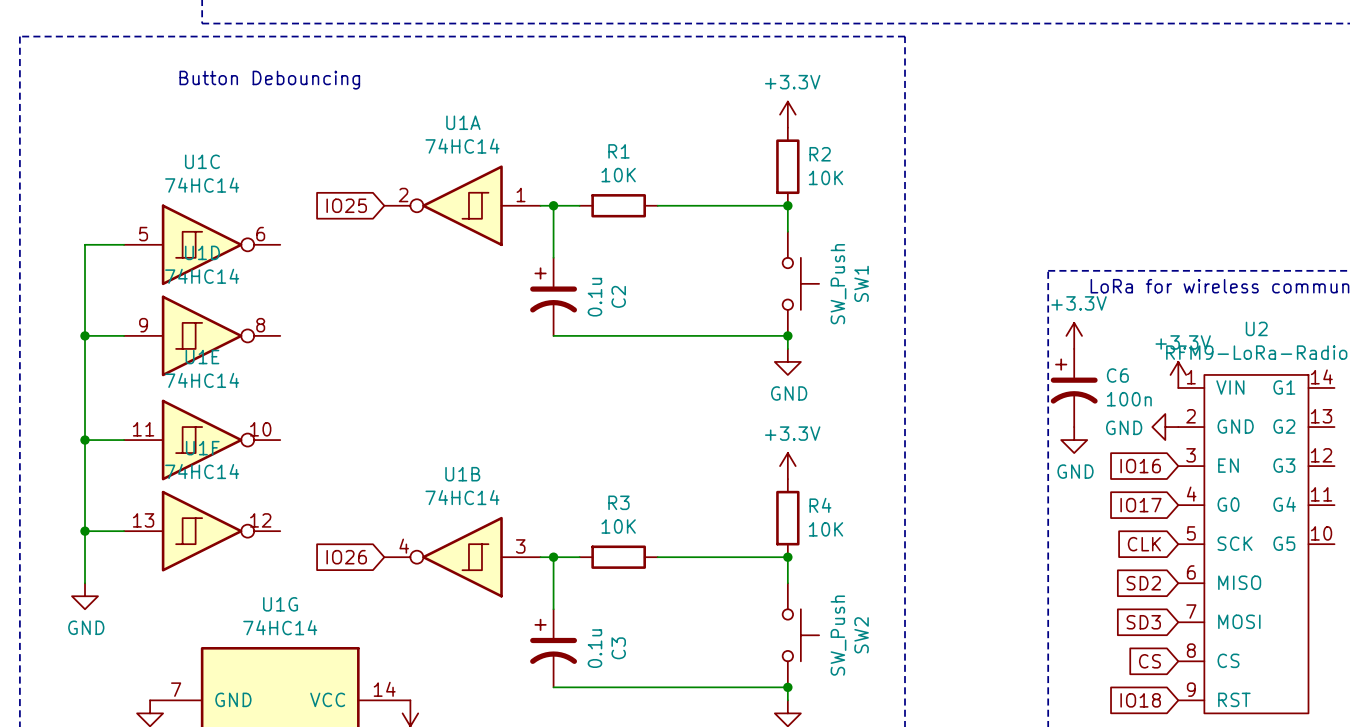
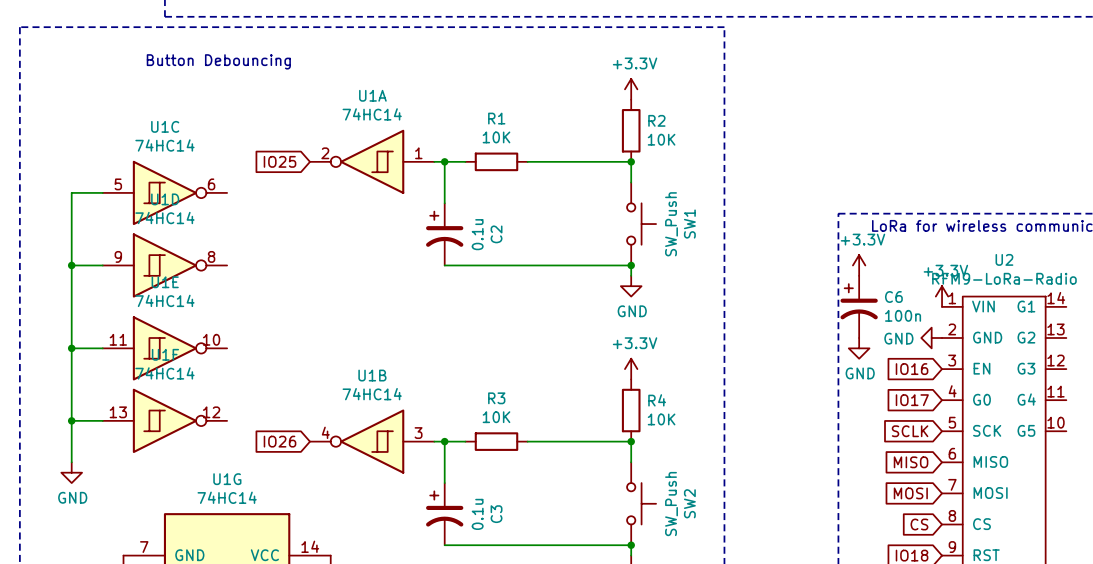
global label: CLK (1144, 544) -> SCLK (910, 431)
global label: SD2 (1143, 583) -> MISO (911, 462)
global label: SD3 (1143, 622) -> MOSI (910, 493)

